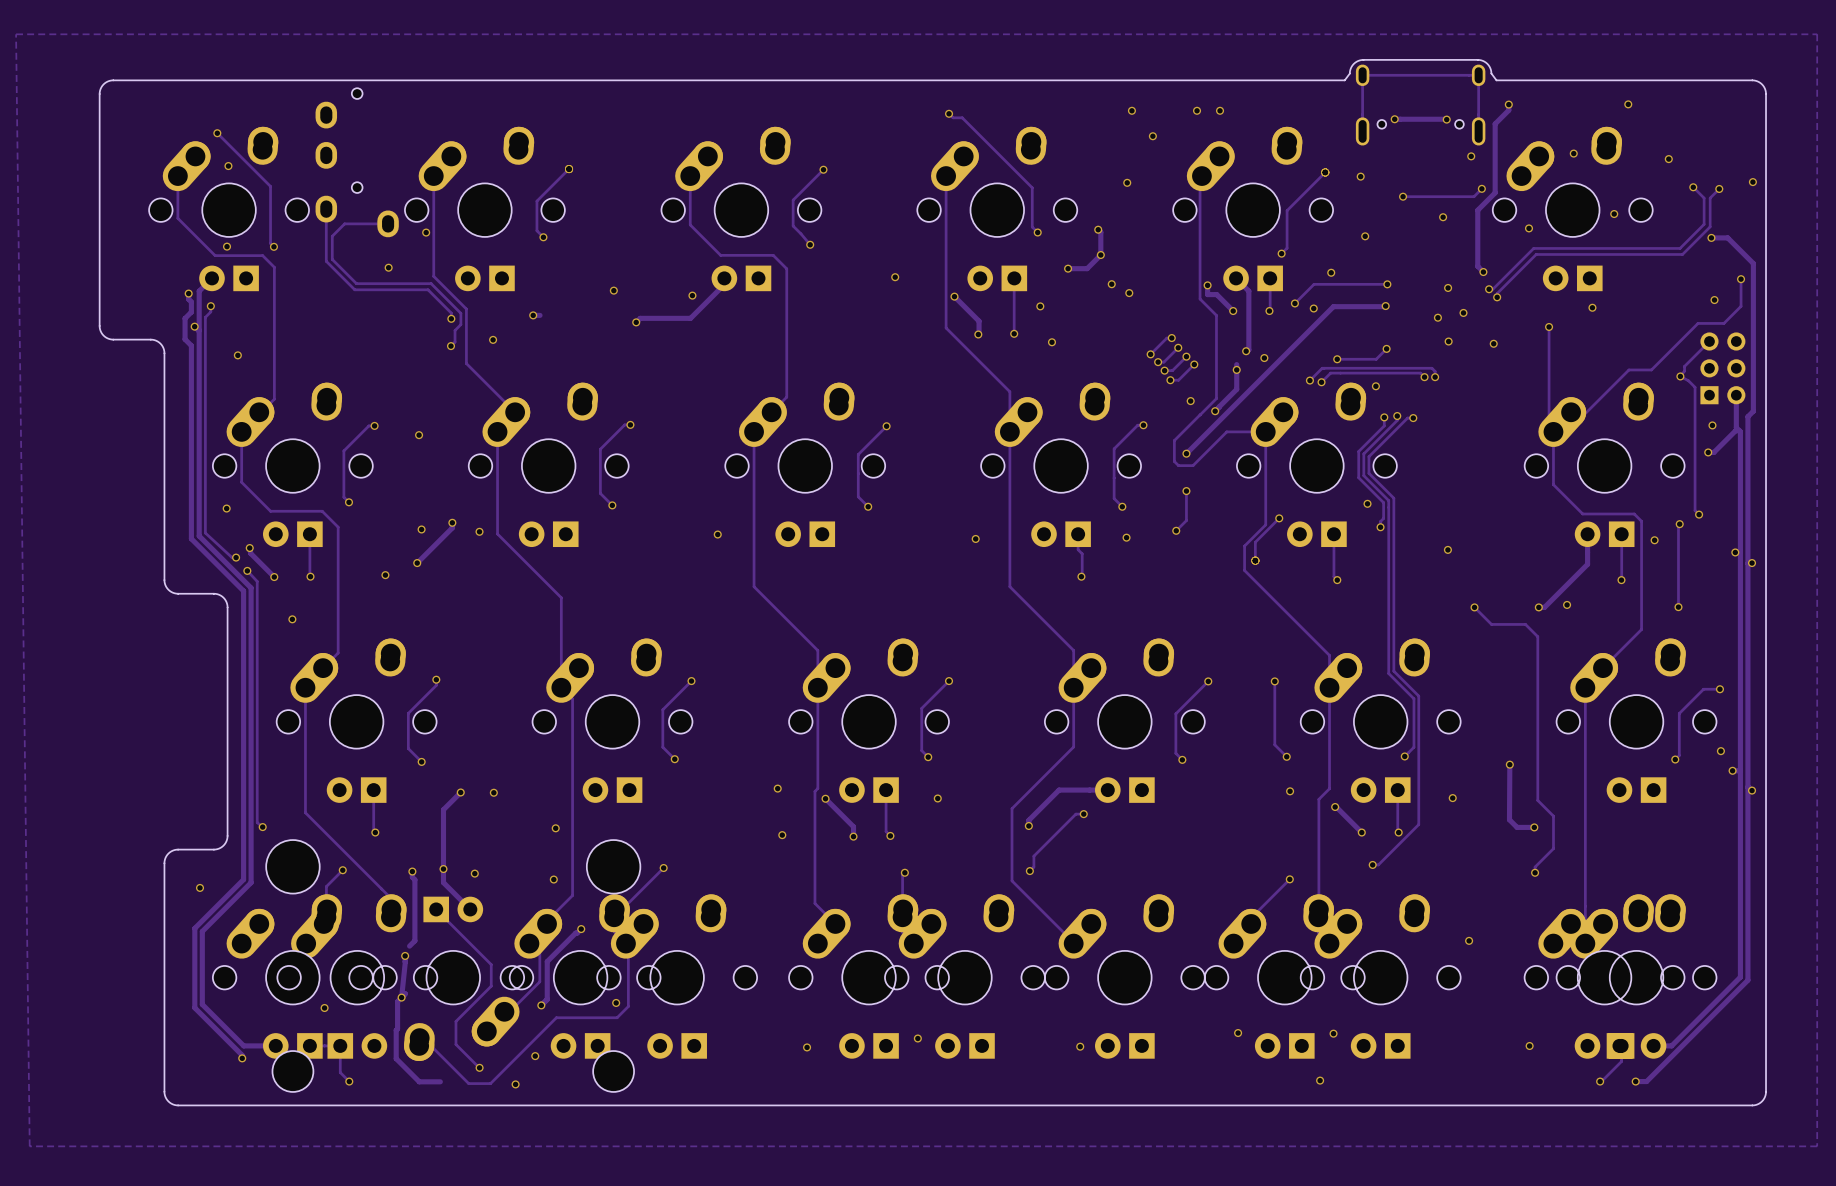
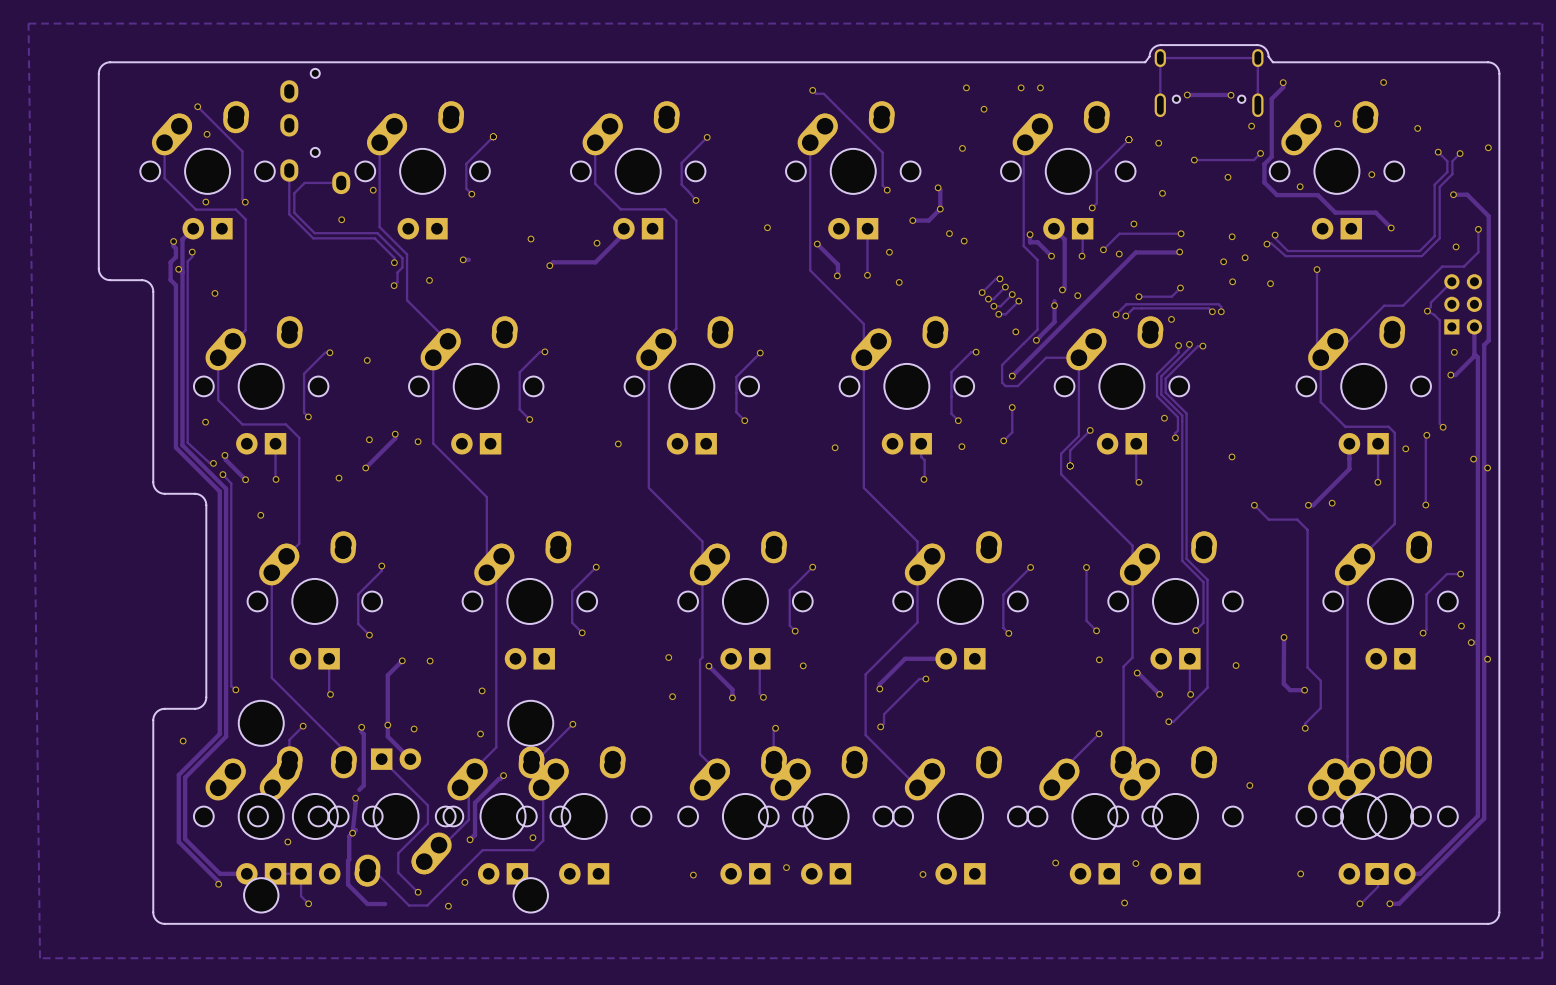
track: (1486, 201) (1477, 210) (1477, 266) (1483, 272) -> (1264, 164) (1264, 182) (1277, 195) (1317, 195) (1335, 212) (1375, 212) (1391, 228)
track: (1704, 210) (1704, 224) (1680, 248) (1533, 248) (1492, 289) (1489, 289) -> (1447, 172) (1434, 184) (1434, 236) (1419, 251) (1287, 251) (1275, 238) (1275, 235)
track: (1710, 213) (1710, 226) (1682, 254) (1536, 254) (1497, 293) (1497, 297) -> (1452, 174) (1439, 186) (1439, 238) (1421, 256) (1285, 256) (1271, 243) (1266, 244)
via: (1483, 272) -> none
via: none -> (1391, 228)
via: none -> (1275, 235)
via: (1489, 289) -> none
via: none -> (1266, 244)
via: (1497, 297) -> none
via: (1592, 307) -> none

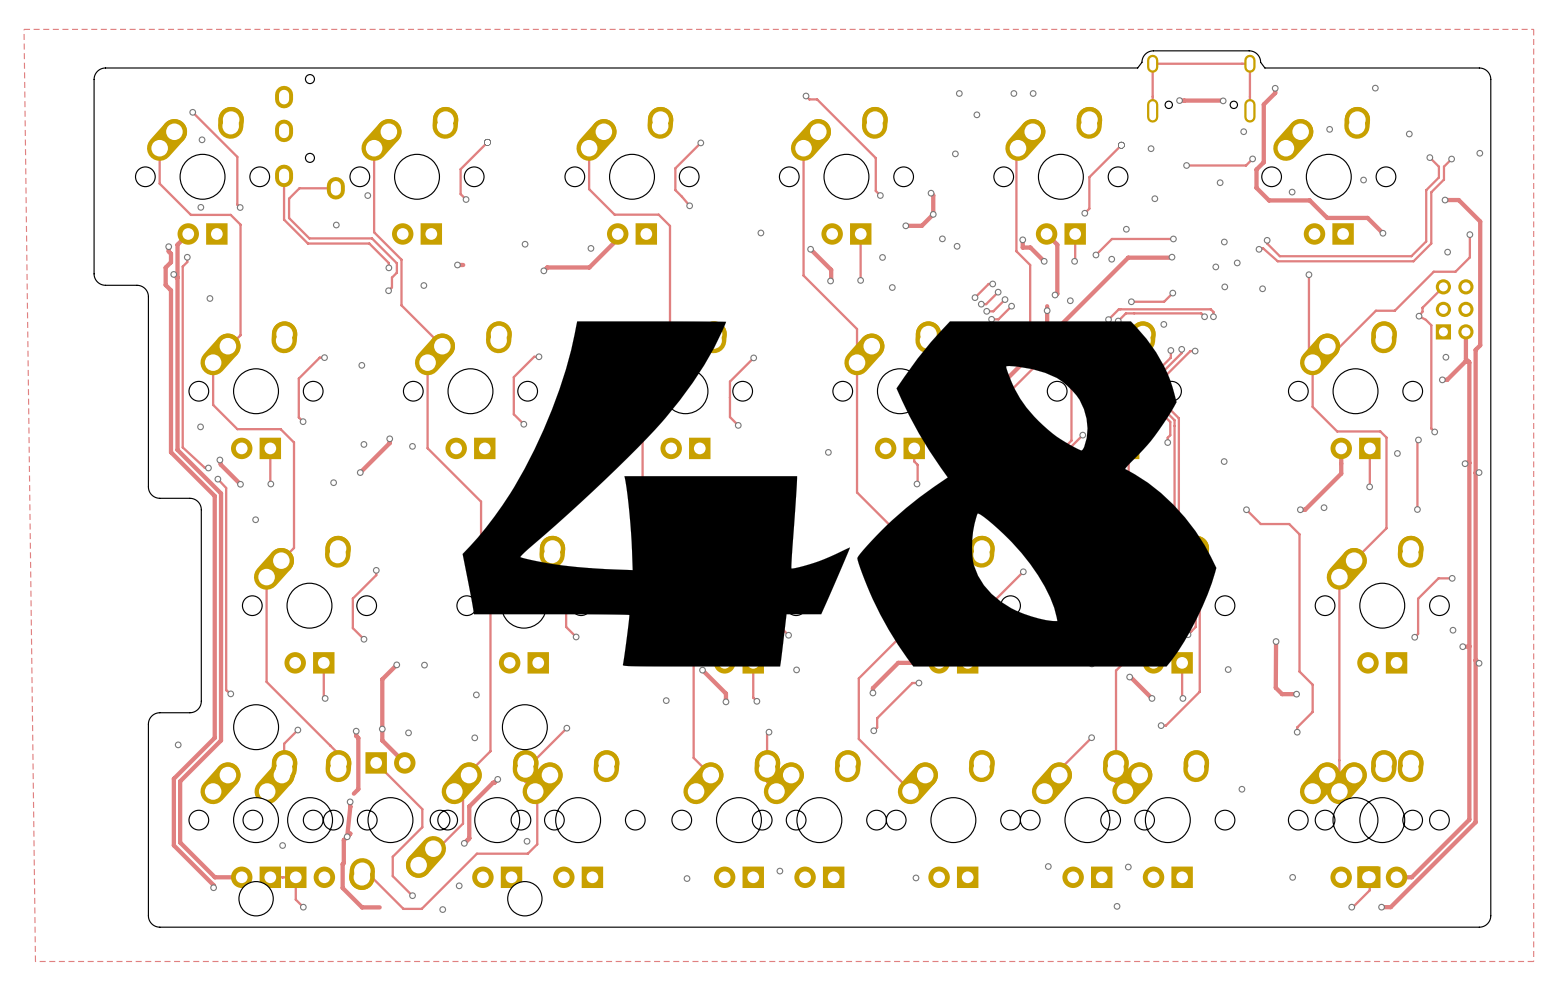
drawing: none -> [462, 321, 1217, 667]

